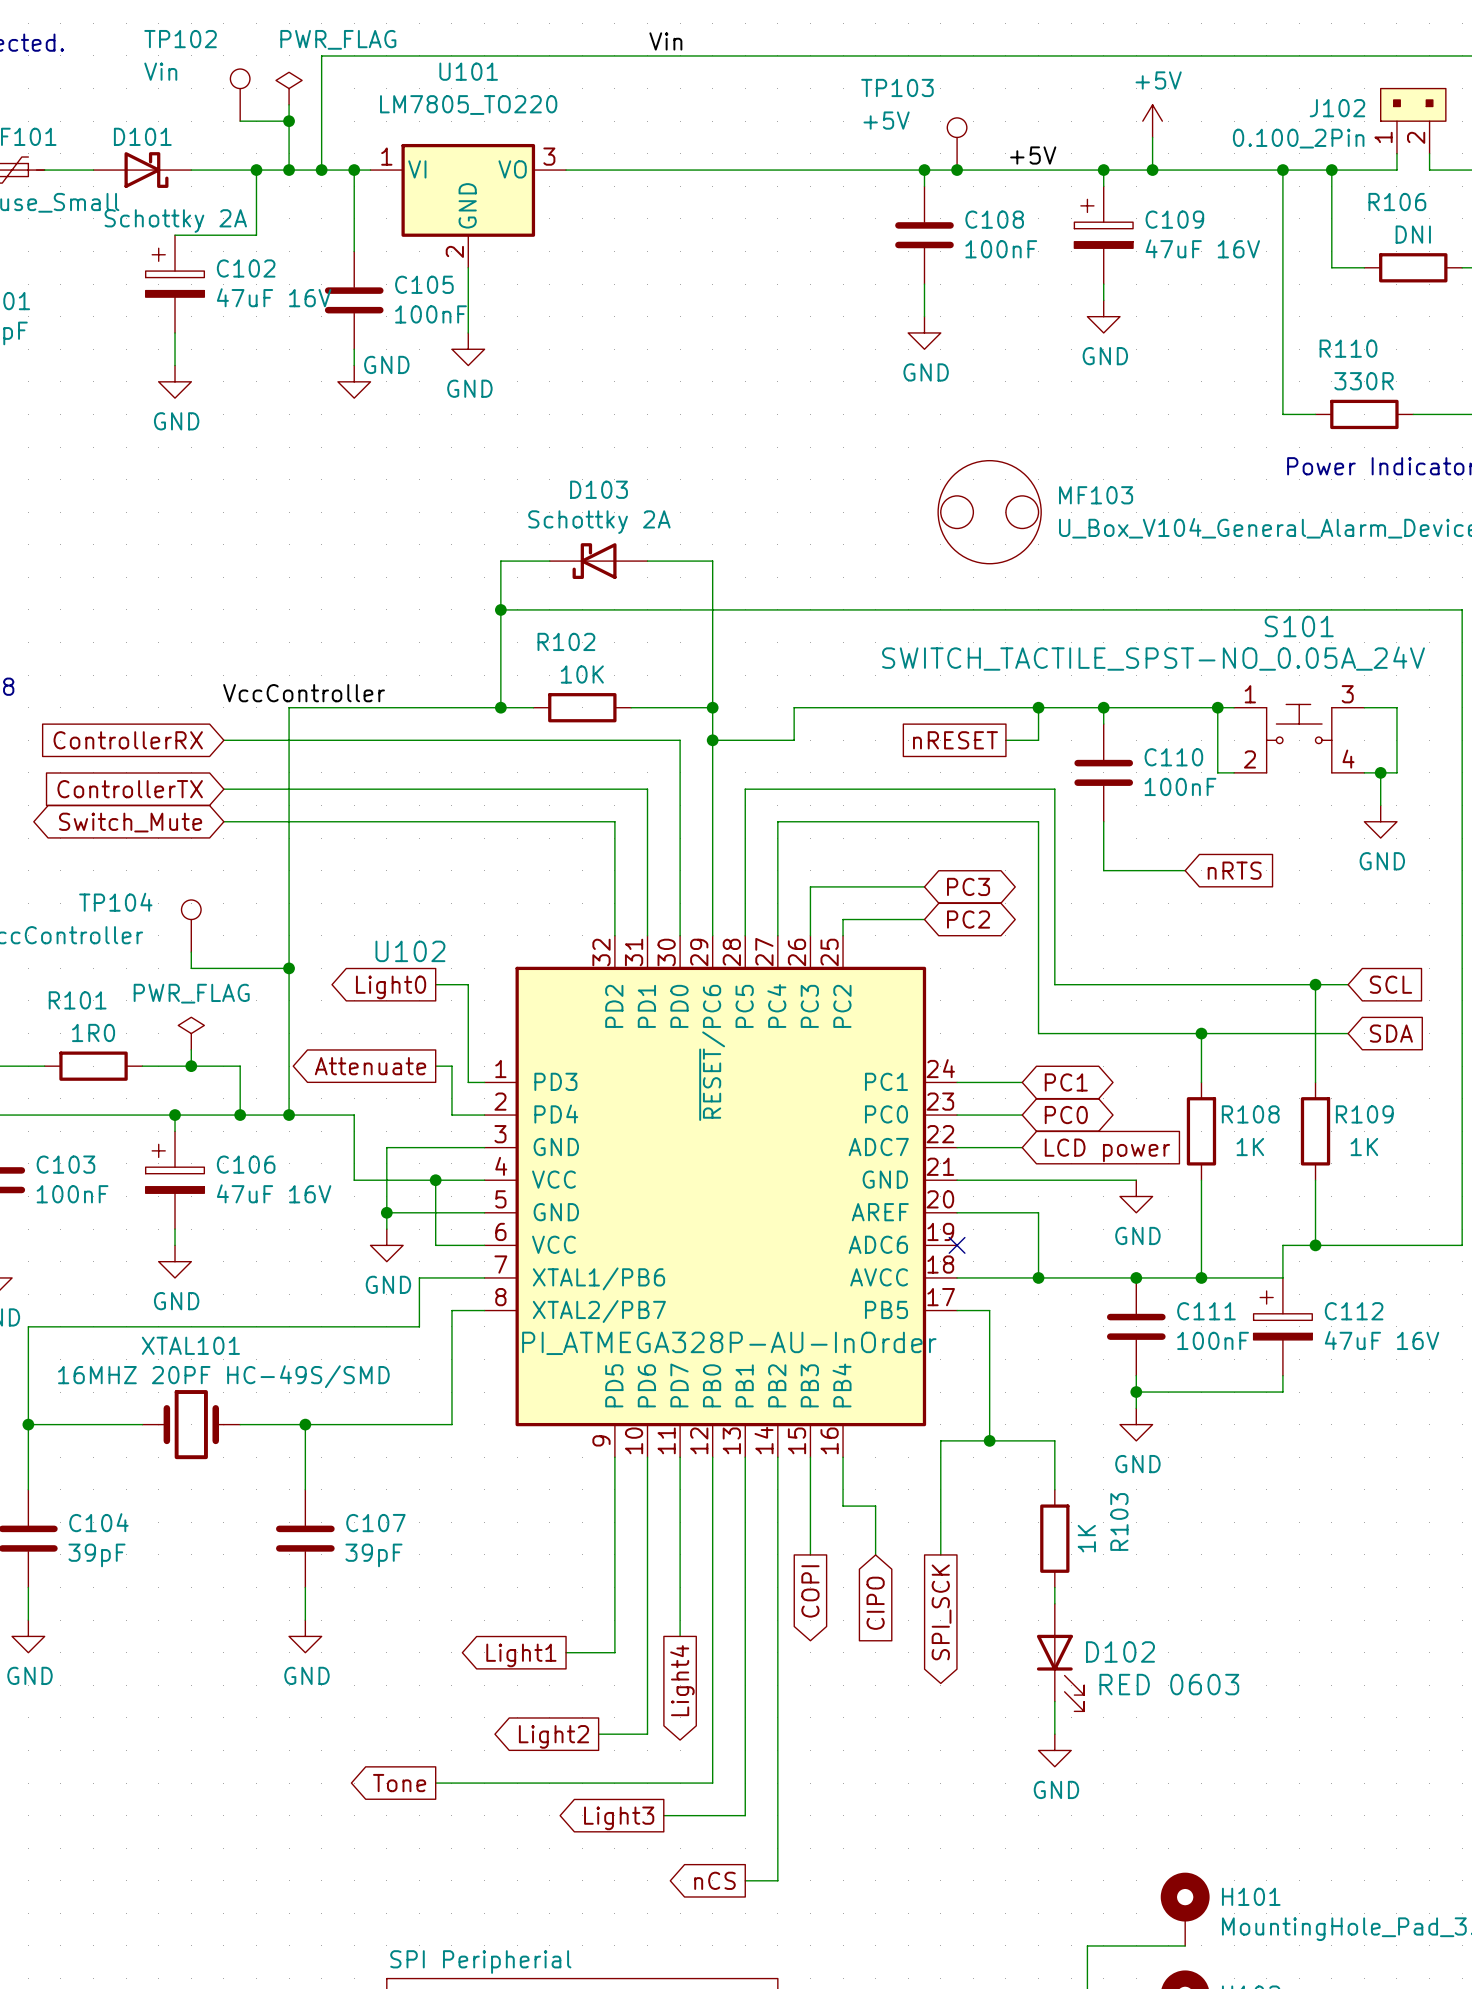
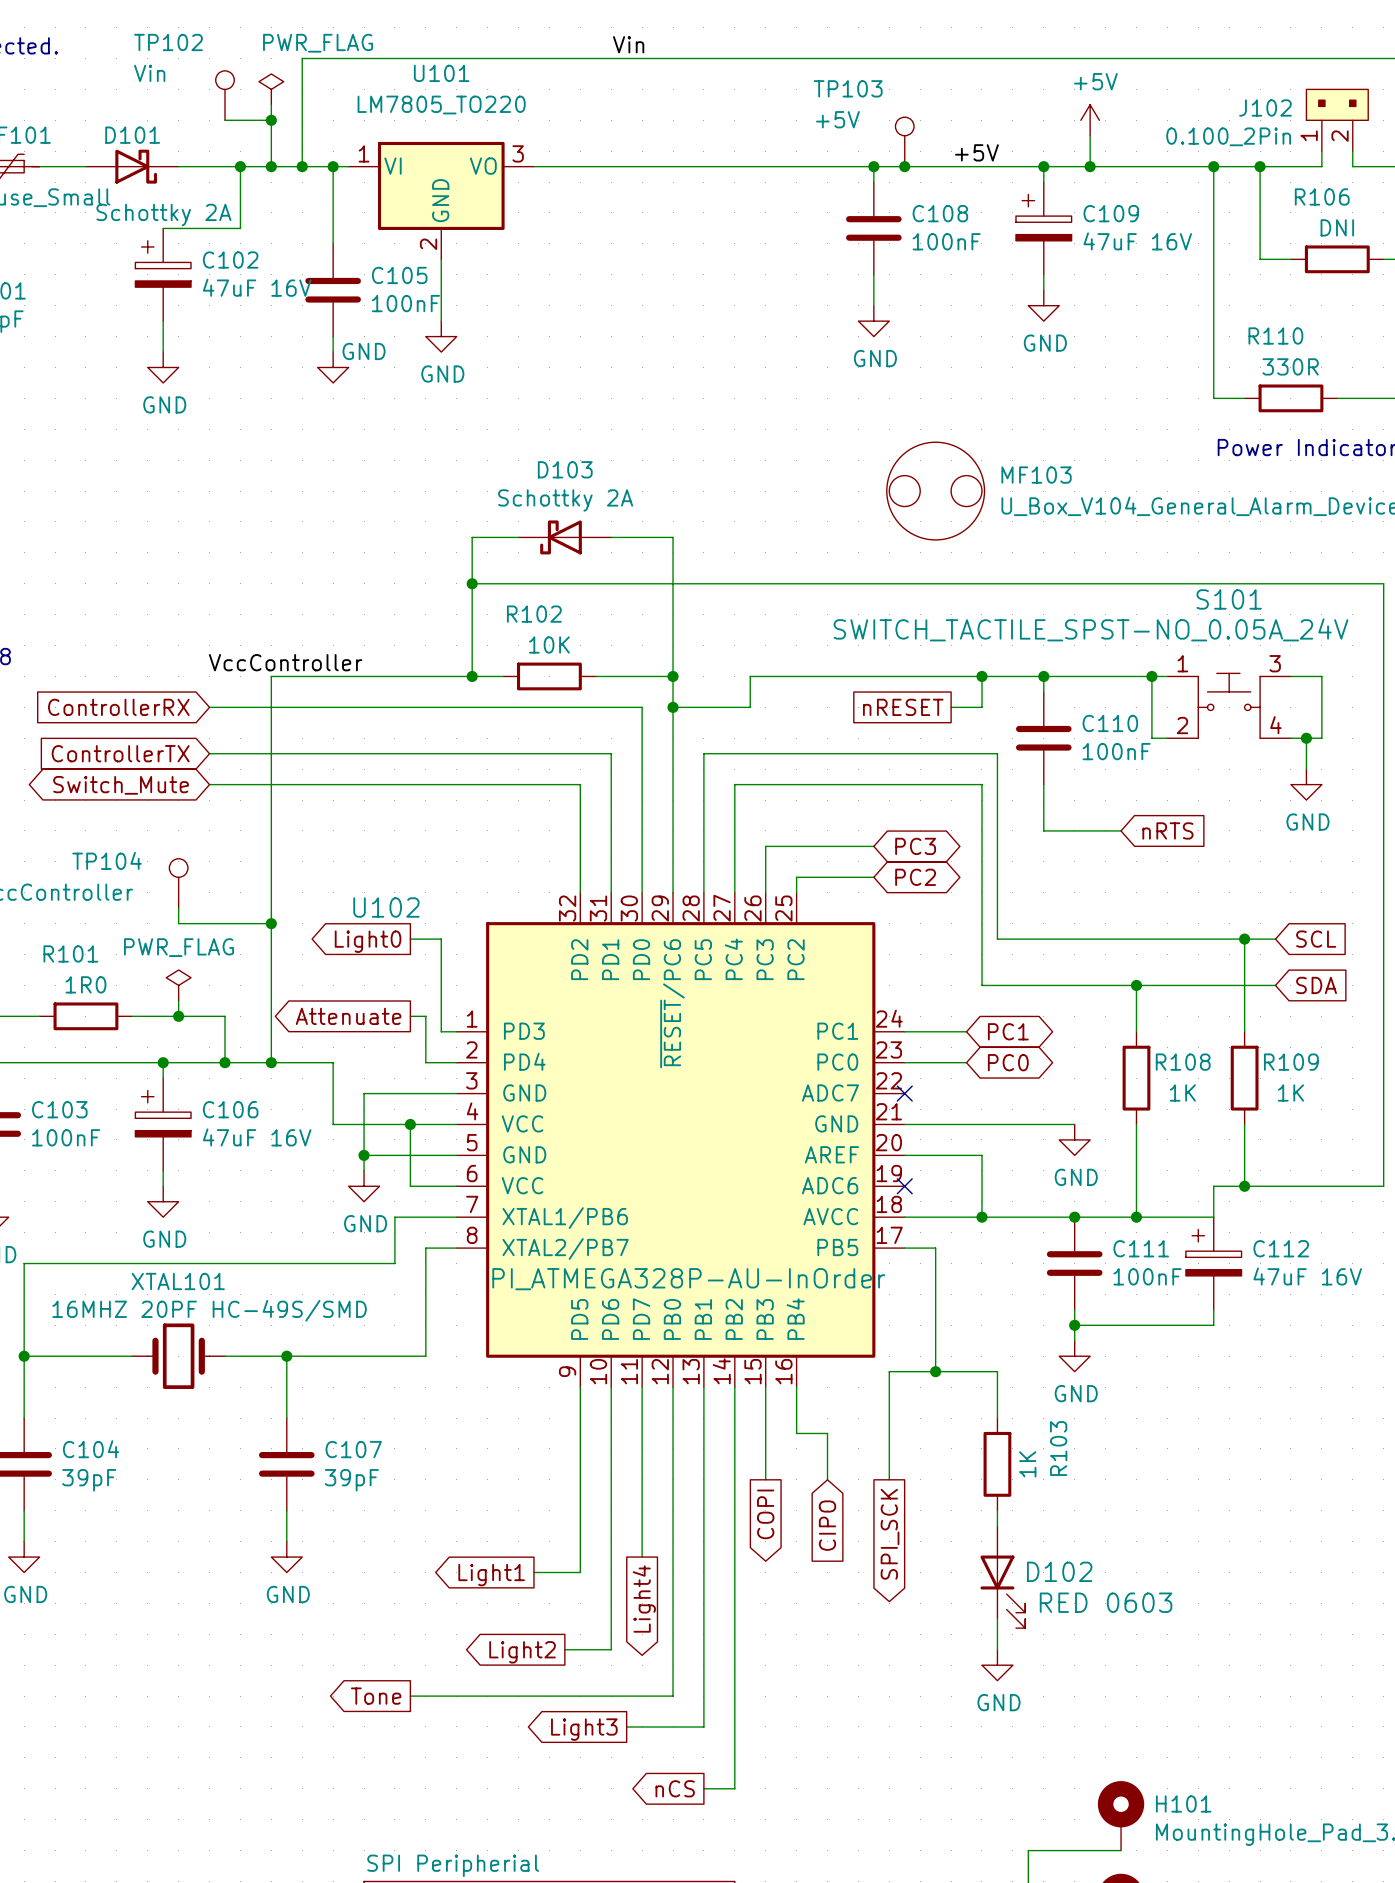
wire: (957, 1147) (1022, 1147) -> none
no-connect mark: none -> (904, 1093)
global label: LCD power (1107, 1150) -> none

